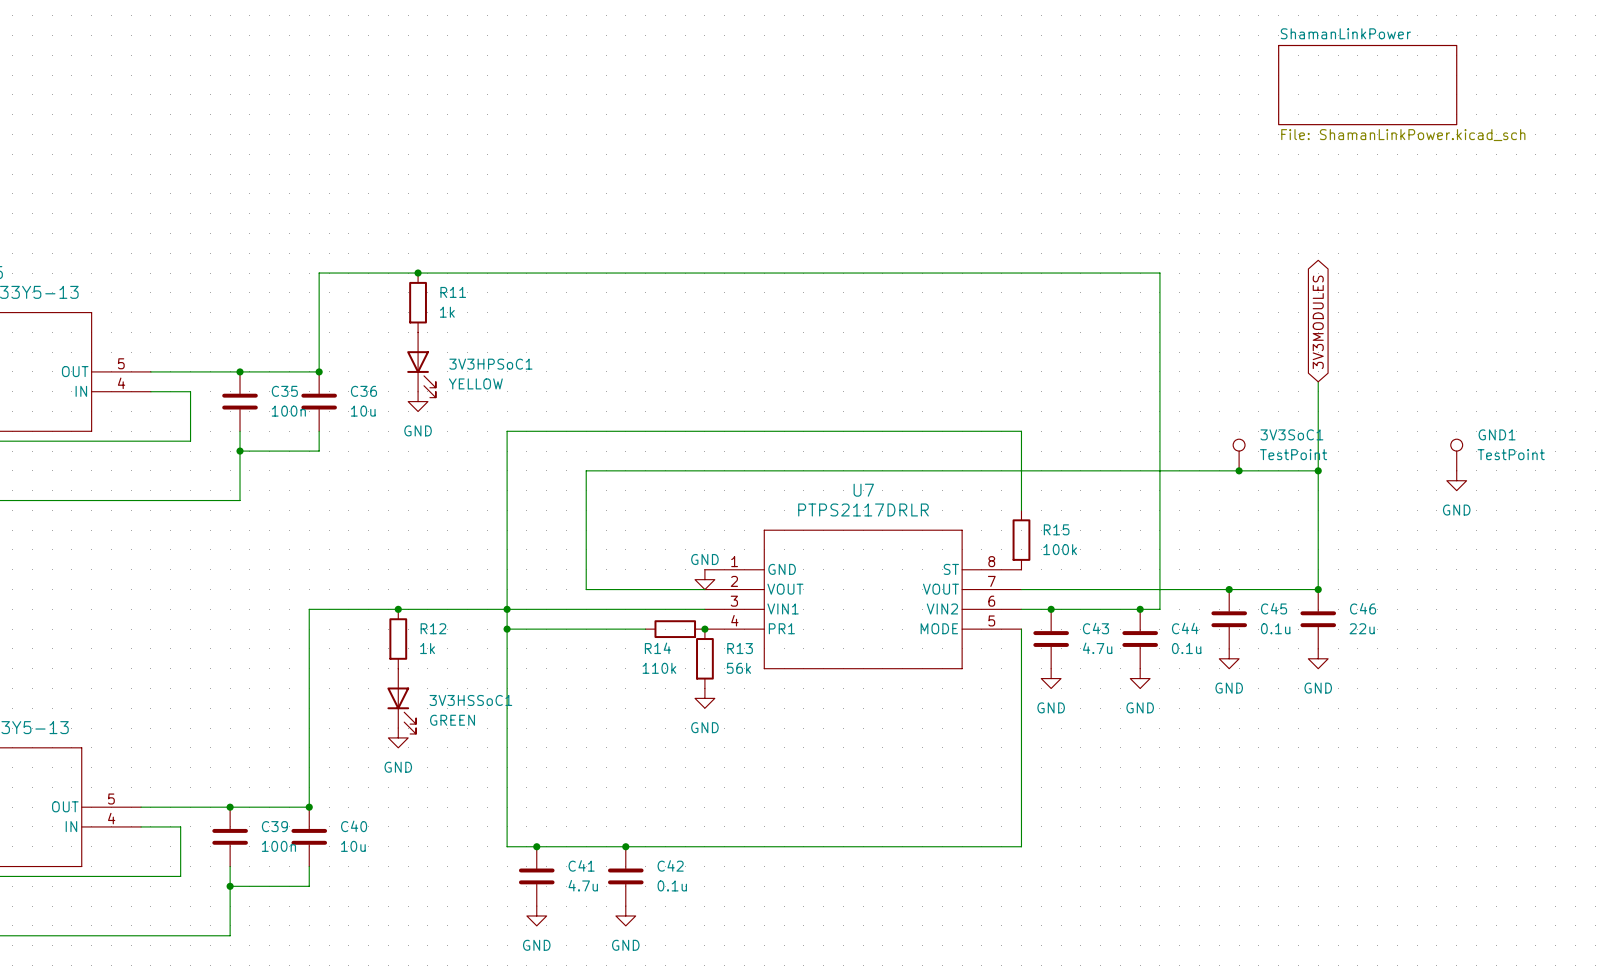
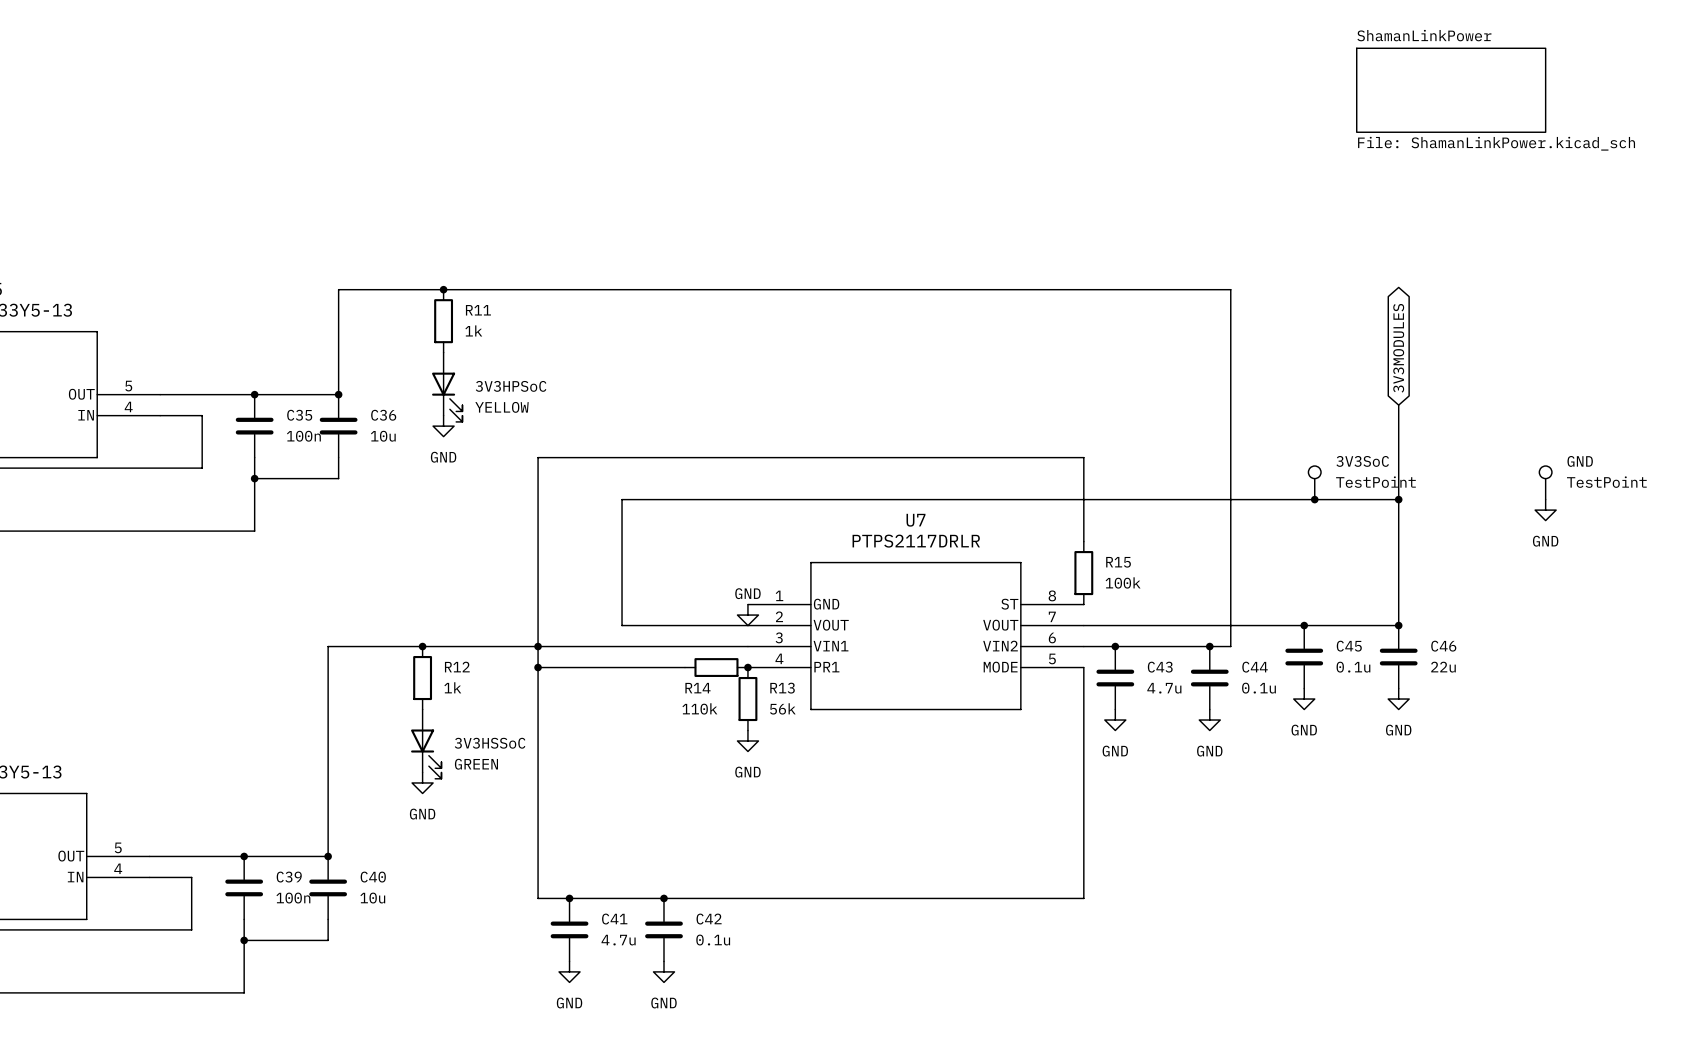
3V3HPSoC1 name: 3V3HPSoC1 (490, 364) -> 3V3HPSoC (511, 386)
3V3SoC1 name: 3V3SoC1 (1291, 434) -> 3V3SoC (1362, 461)
GND1 name: GND1 (1497, 434) -> GND (1580, 461)
3V3HSSoC1 name: 3V3HSSoC1 (470, 700) -> 3V3HSSoC (490, 743)

